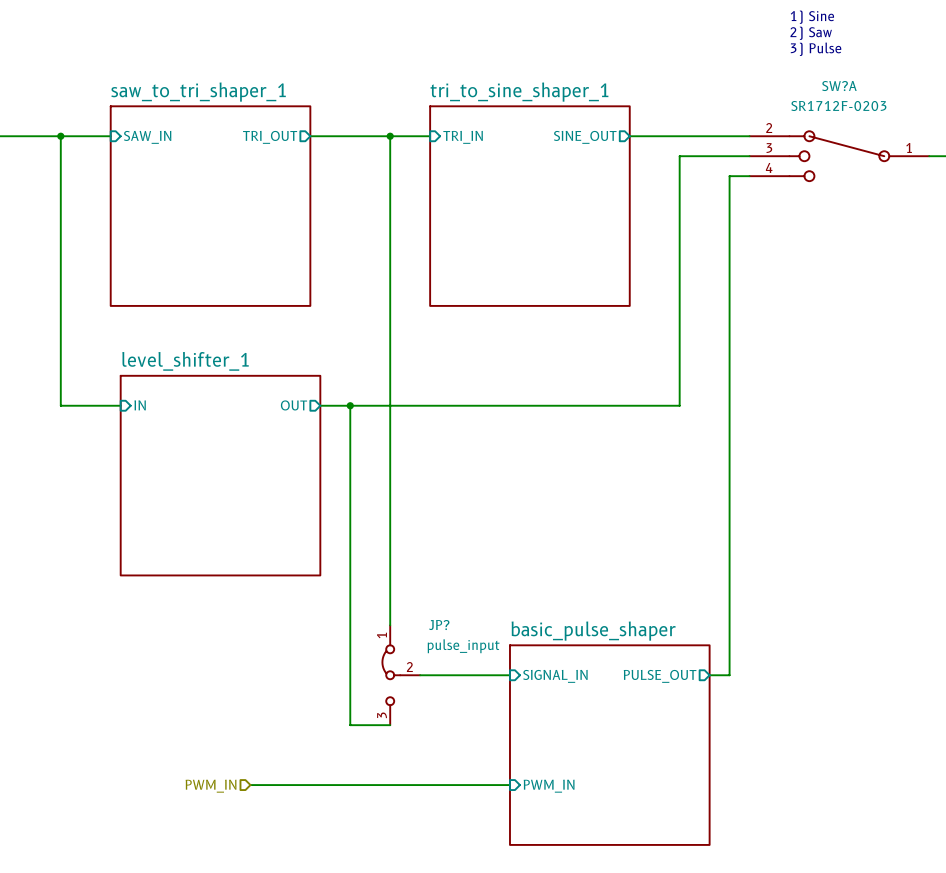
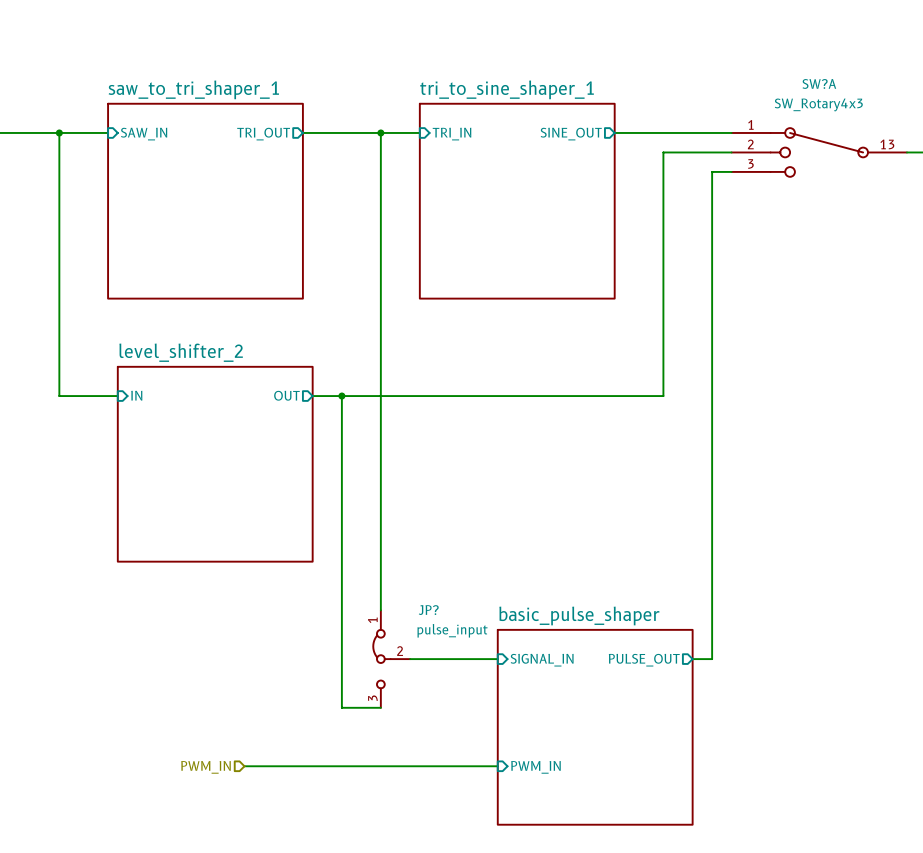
text: 1) Sine (812, 17) -> none
text: 2) Saw (811, 33) -> none
text: 3) Pulse (816, 49) -> none
SW?A value: SR1712F-0203 (838, 105) -> SW_Rotary4x3 (818, 104)
SW?A pin number: 2 (769, 128) -> 1 (750, 124)
SW?A pin number: 1 (909, 147) -> 13 (887, 144)
SW?A pin number: 3 (769, 148) -> 2 (750, 144)
SW?A pin number: 4 (769, 167) -> 3 (750, 163)
sheet level_shifter_1 name: level_shifter_1 (185, 361) -> level_shifter_2 (181, 352)

